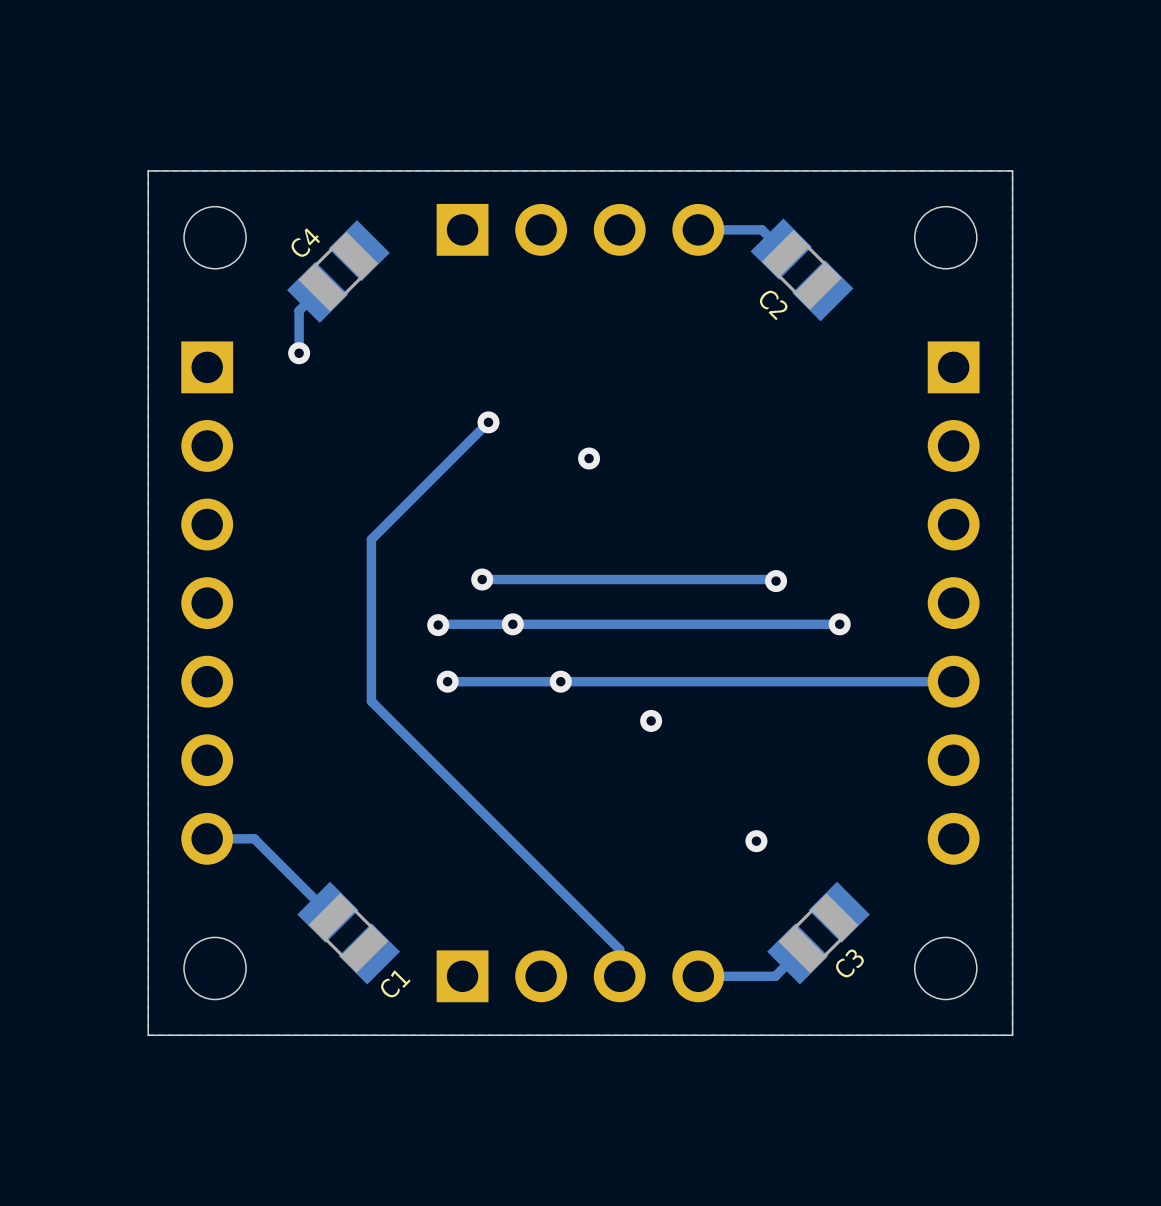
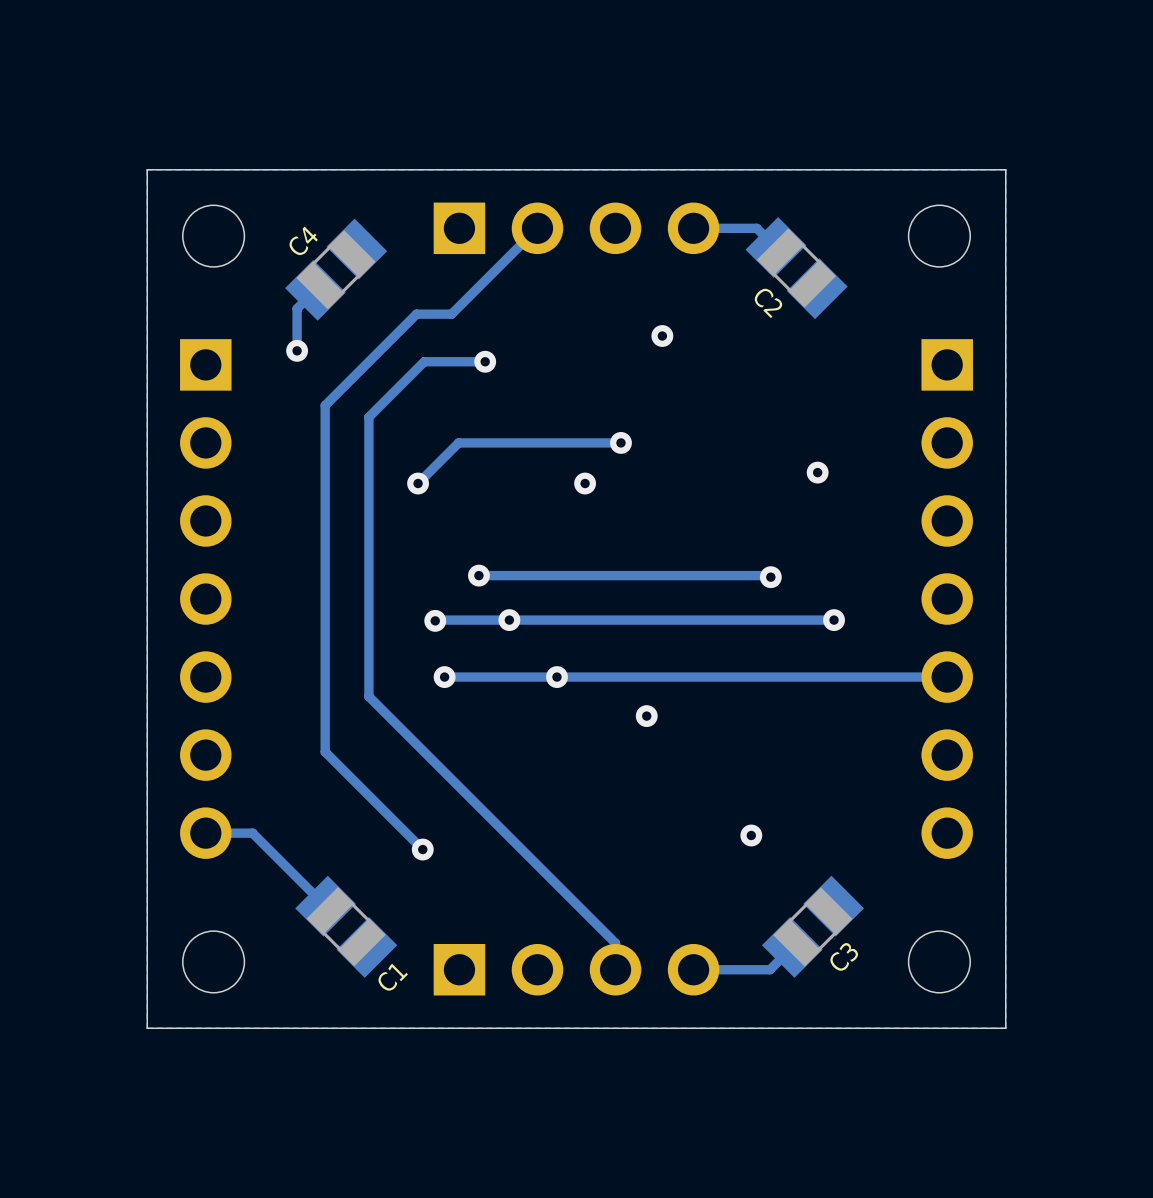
track: none -> (537, 228) (451, 314) (416, 314) (325, 405) (325, 751) (422, 849)
via: none -> (662, 336)
via: none -> (485, 361)
track: (488, 422) (371, 539) -> (485, 361) (424, 361) (368, 417) (368, 535)
via: (488, 422) -> none
track: none -> (620, 442) (458, 442) (418, 483)
via: none -> (620, 442)
via: (589, 458) -> none
via: none -> (817, 472)
via: none -> (418, 483)
via: none -> (585, 483)
via: none -> (422, 849)

